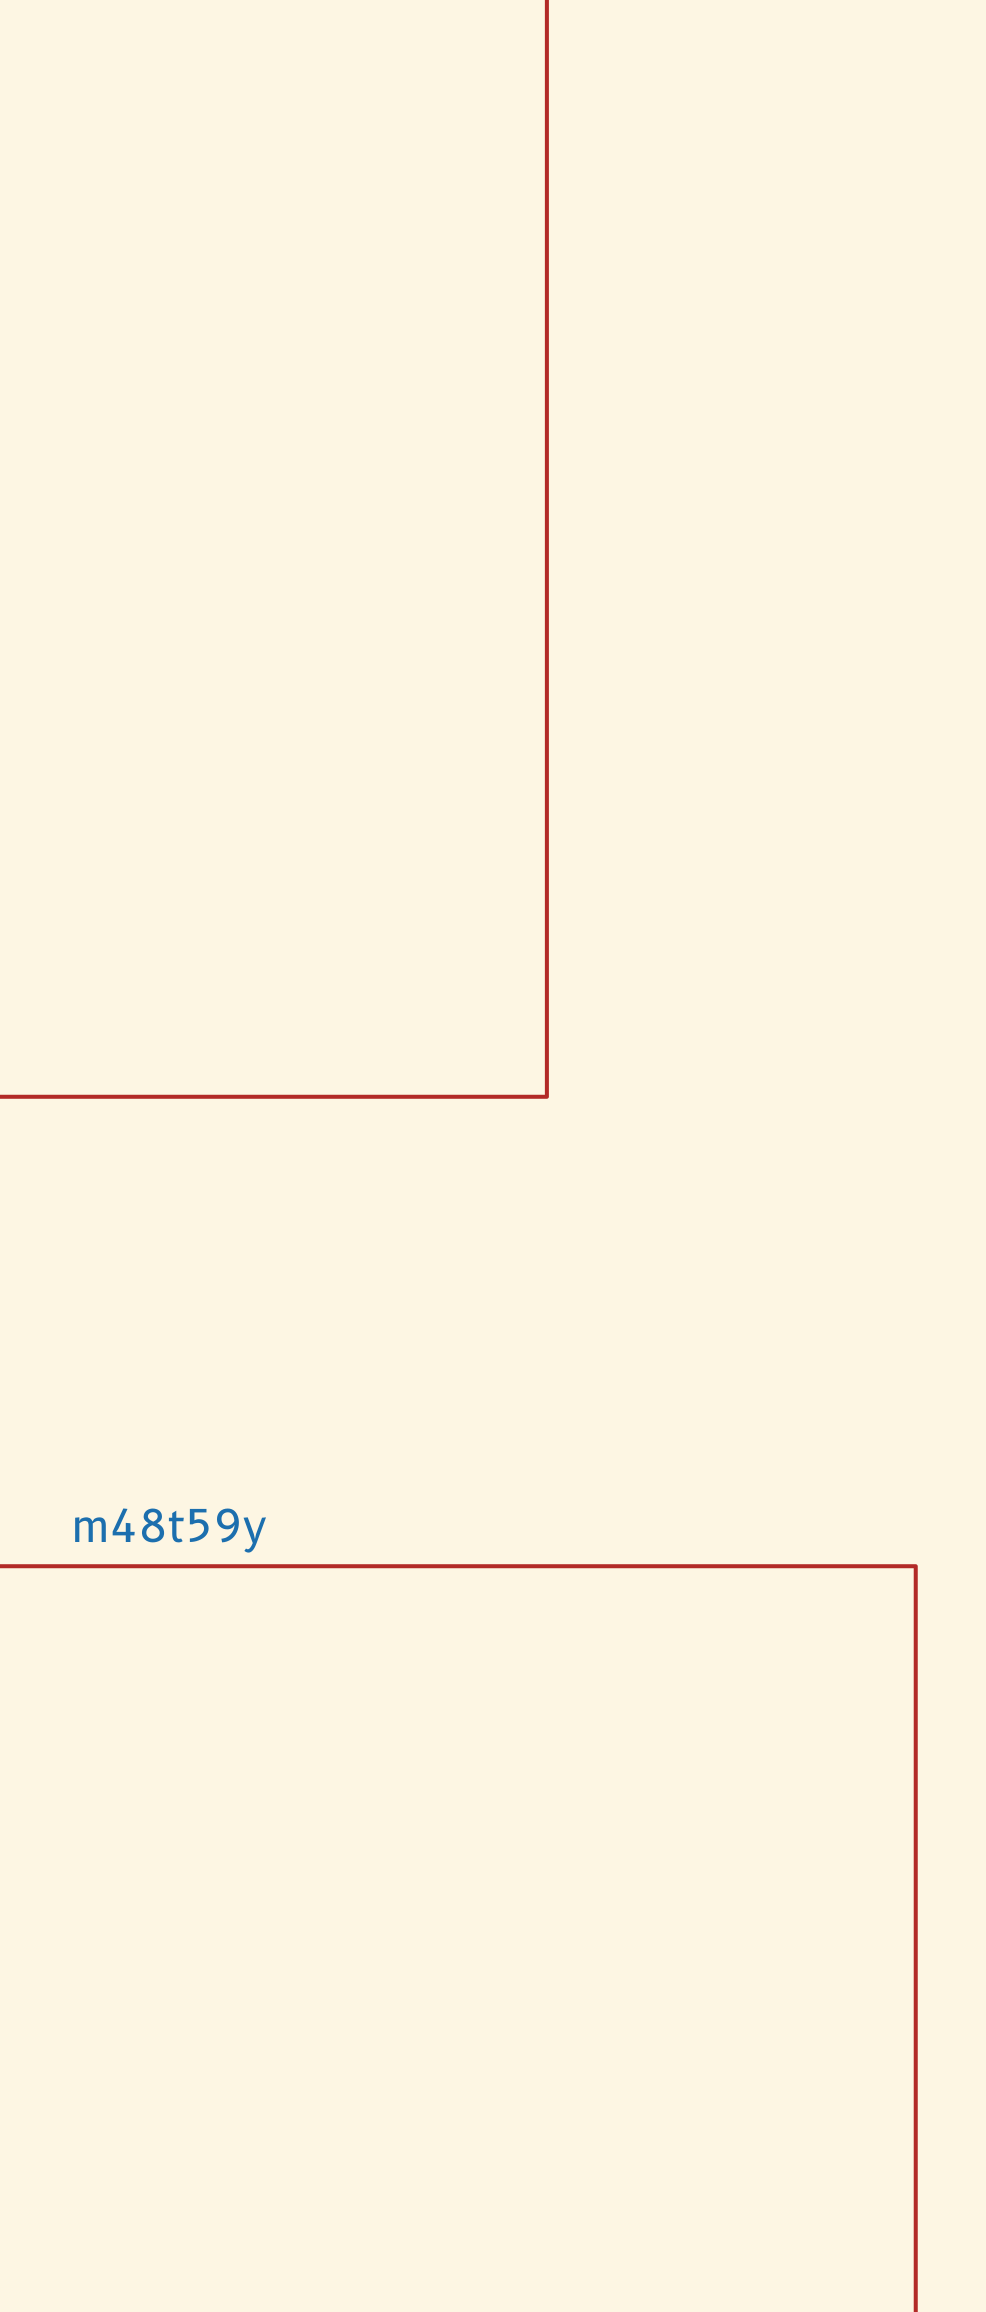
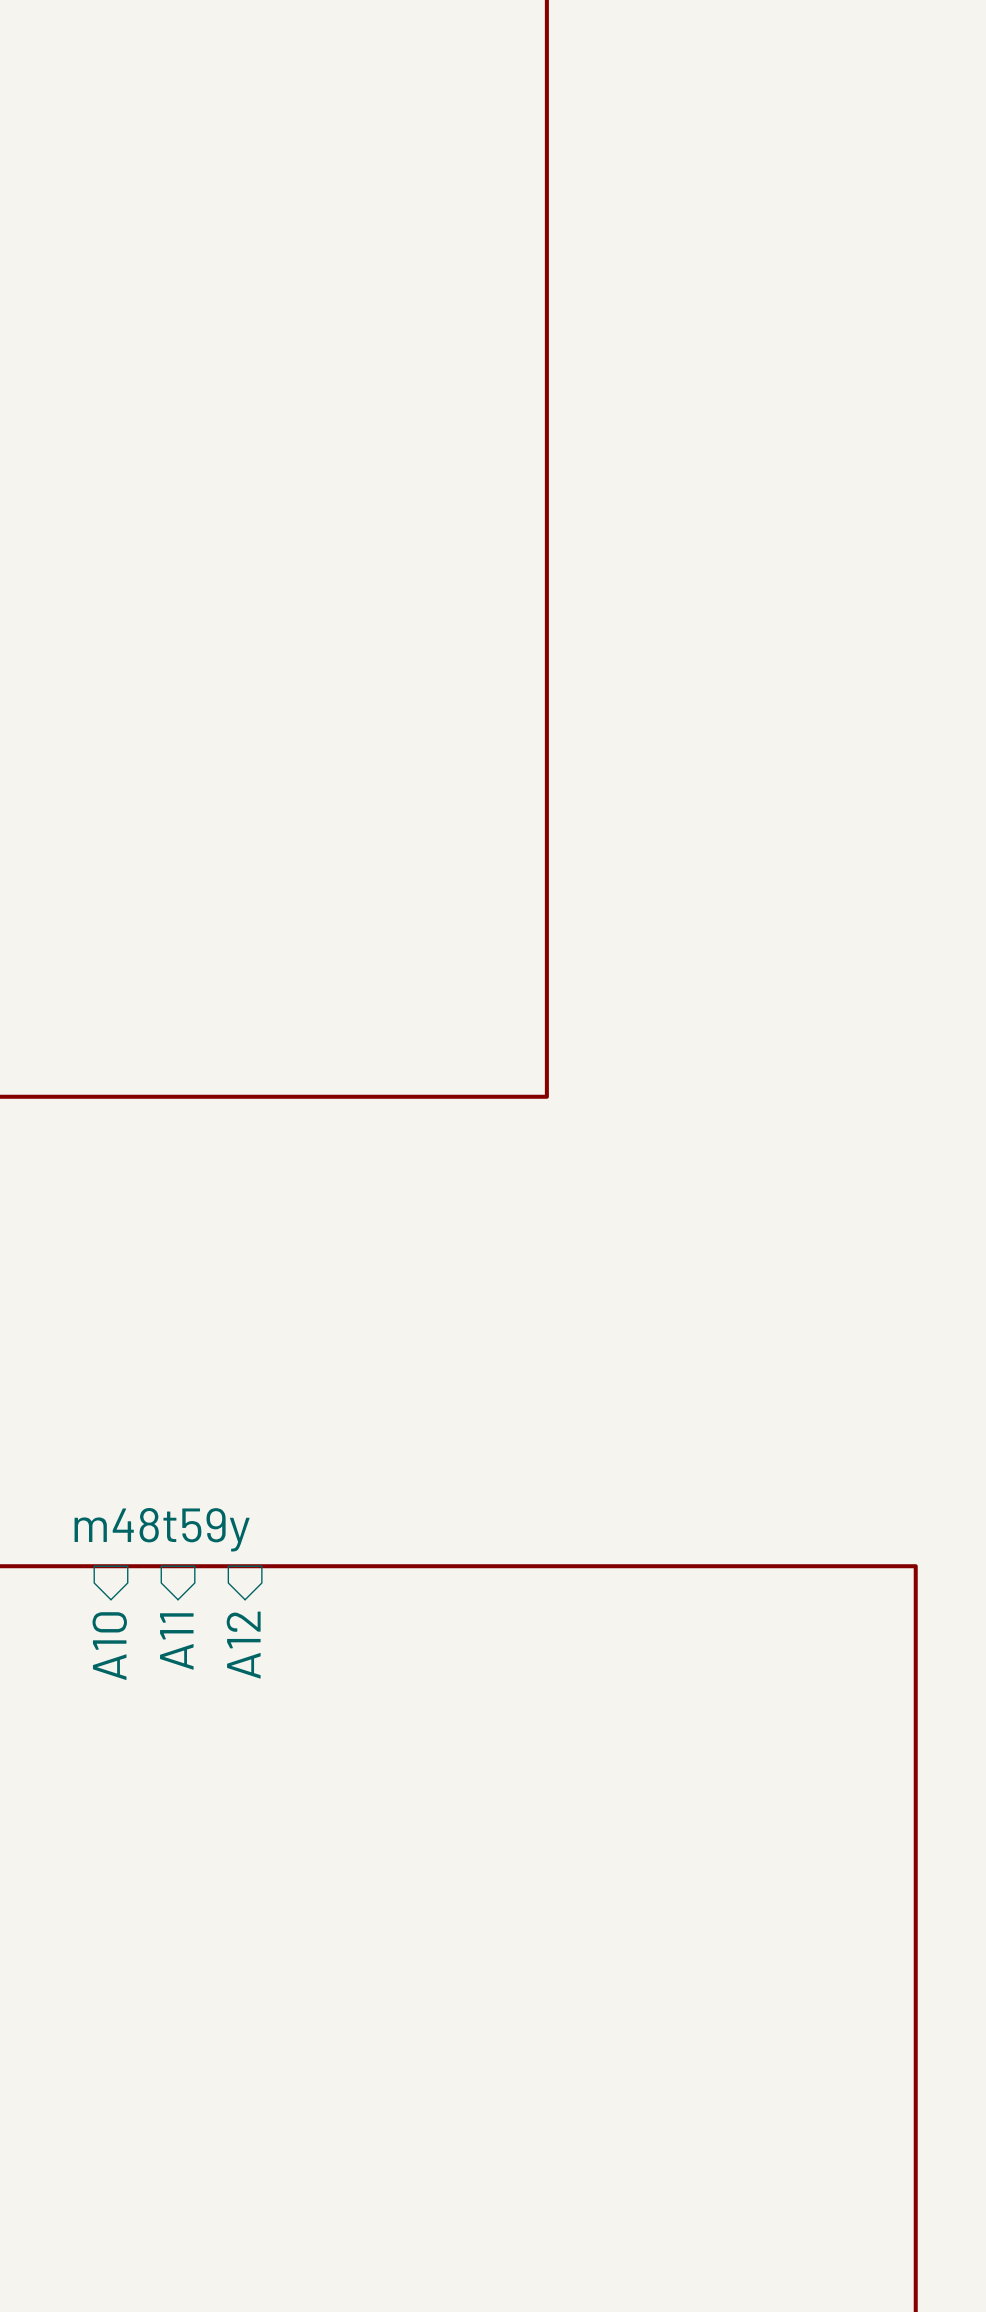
sheet pin: none -> A10 (109, 1646)
sheet pin: none -> A11 (176, 1641)
sheet pin: none -> A12 (243, 1645)

